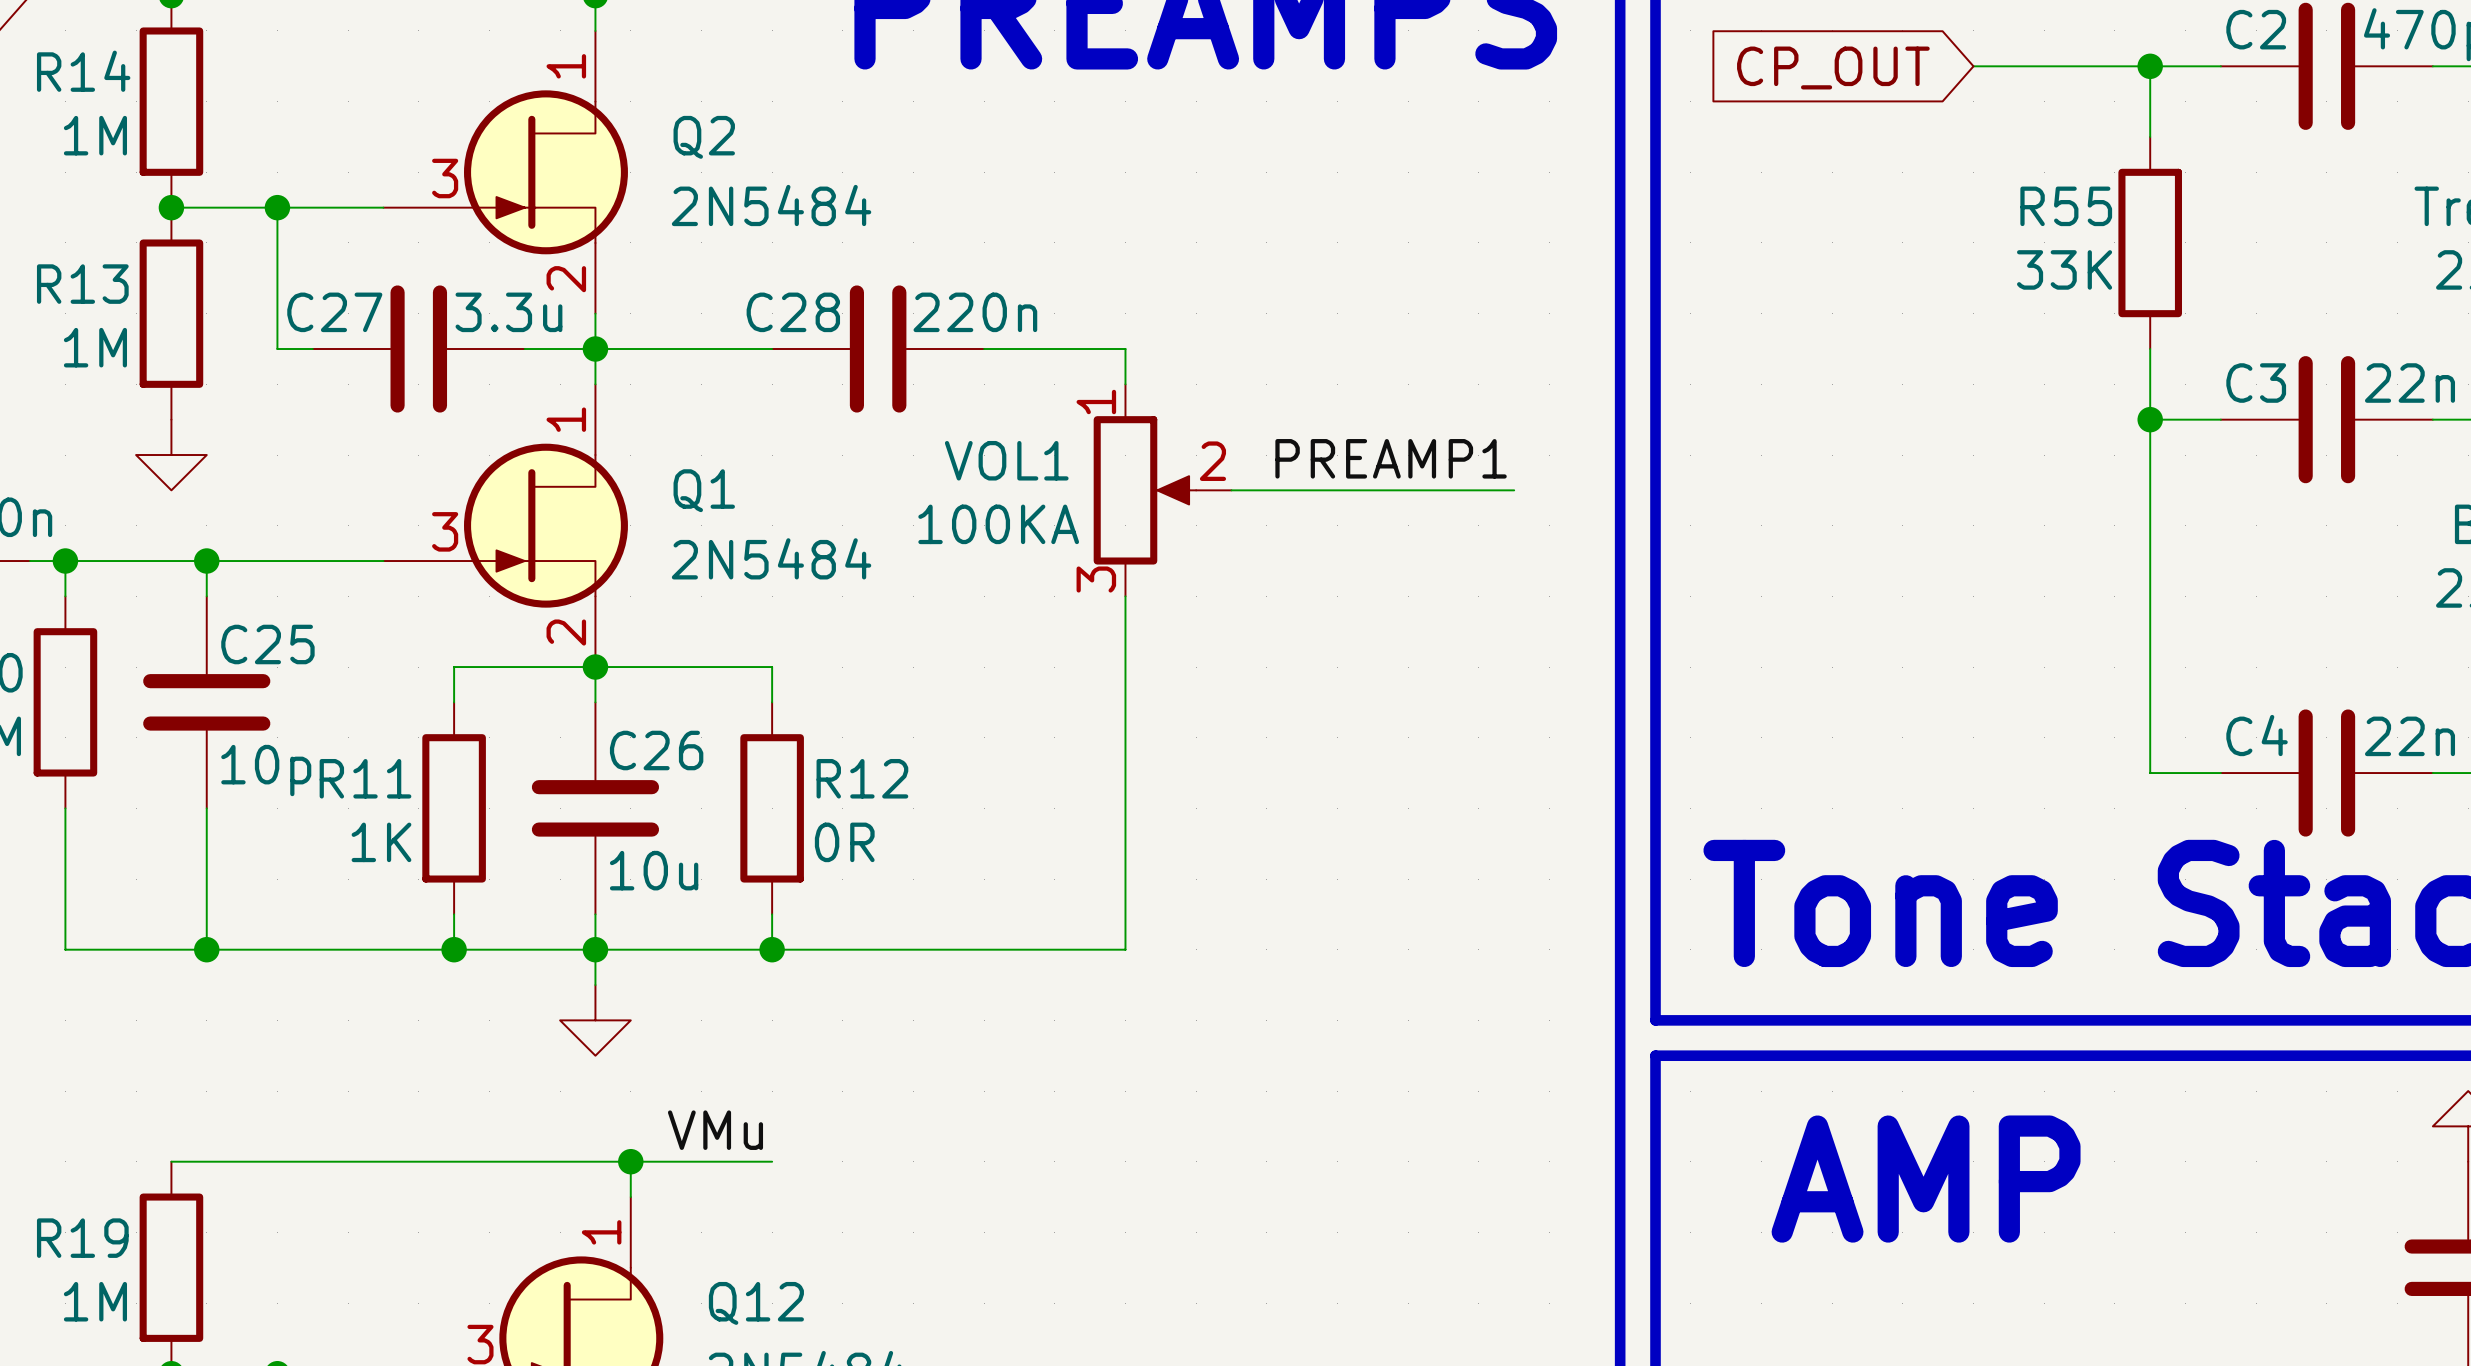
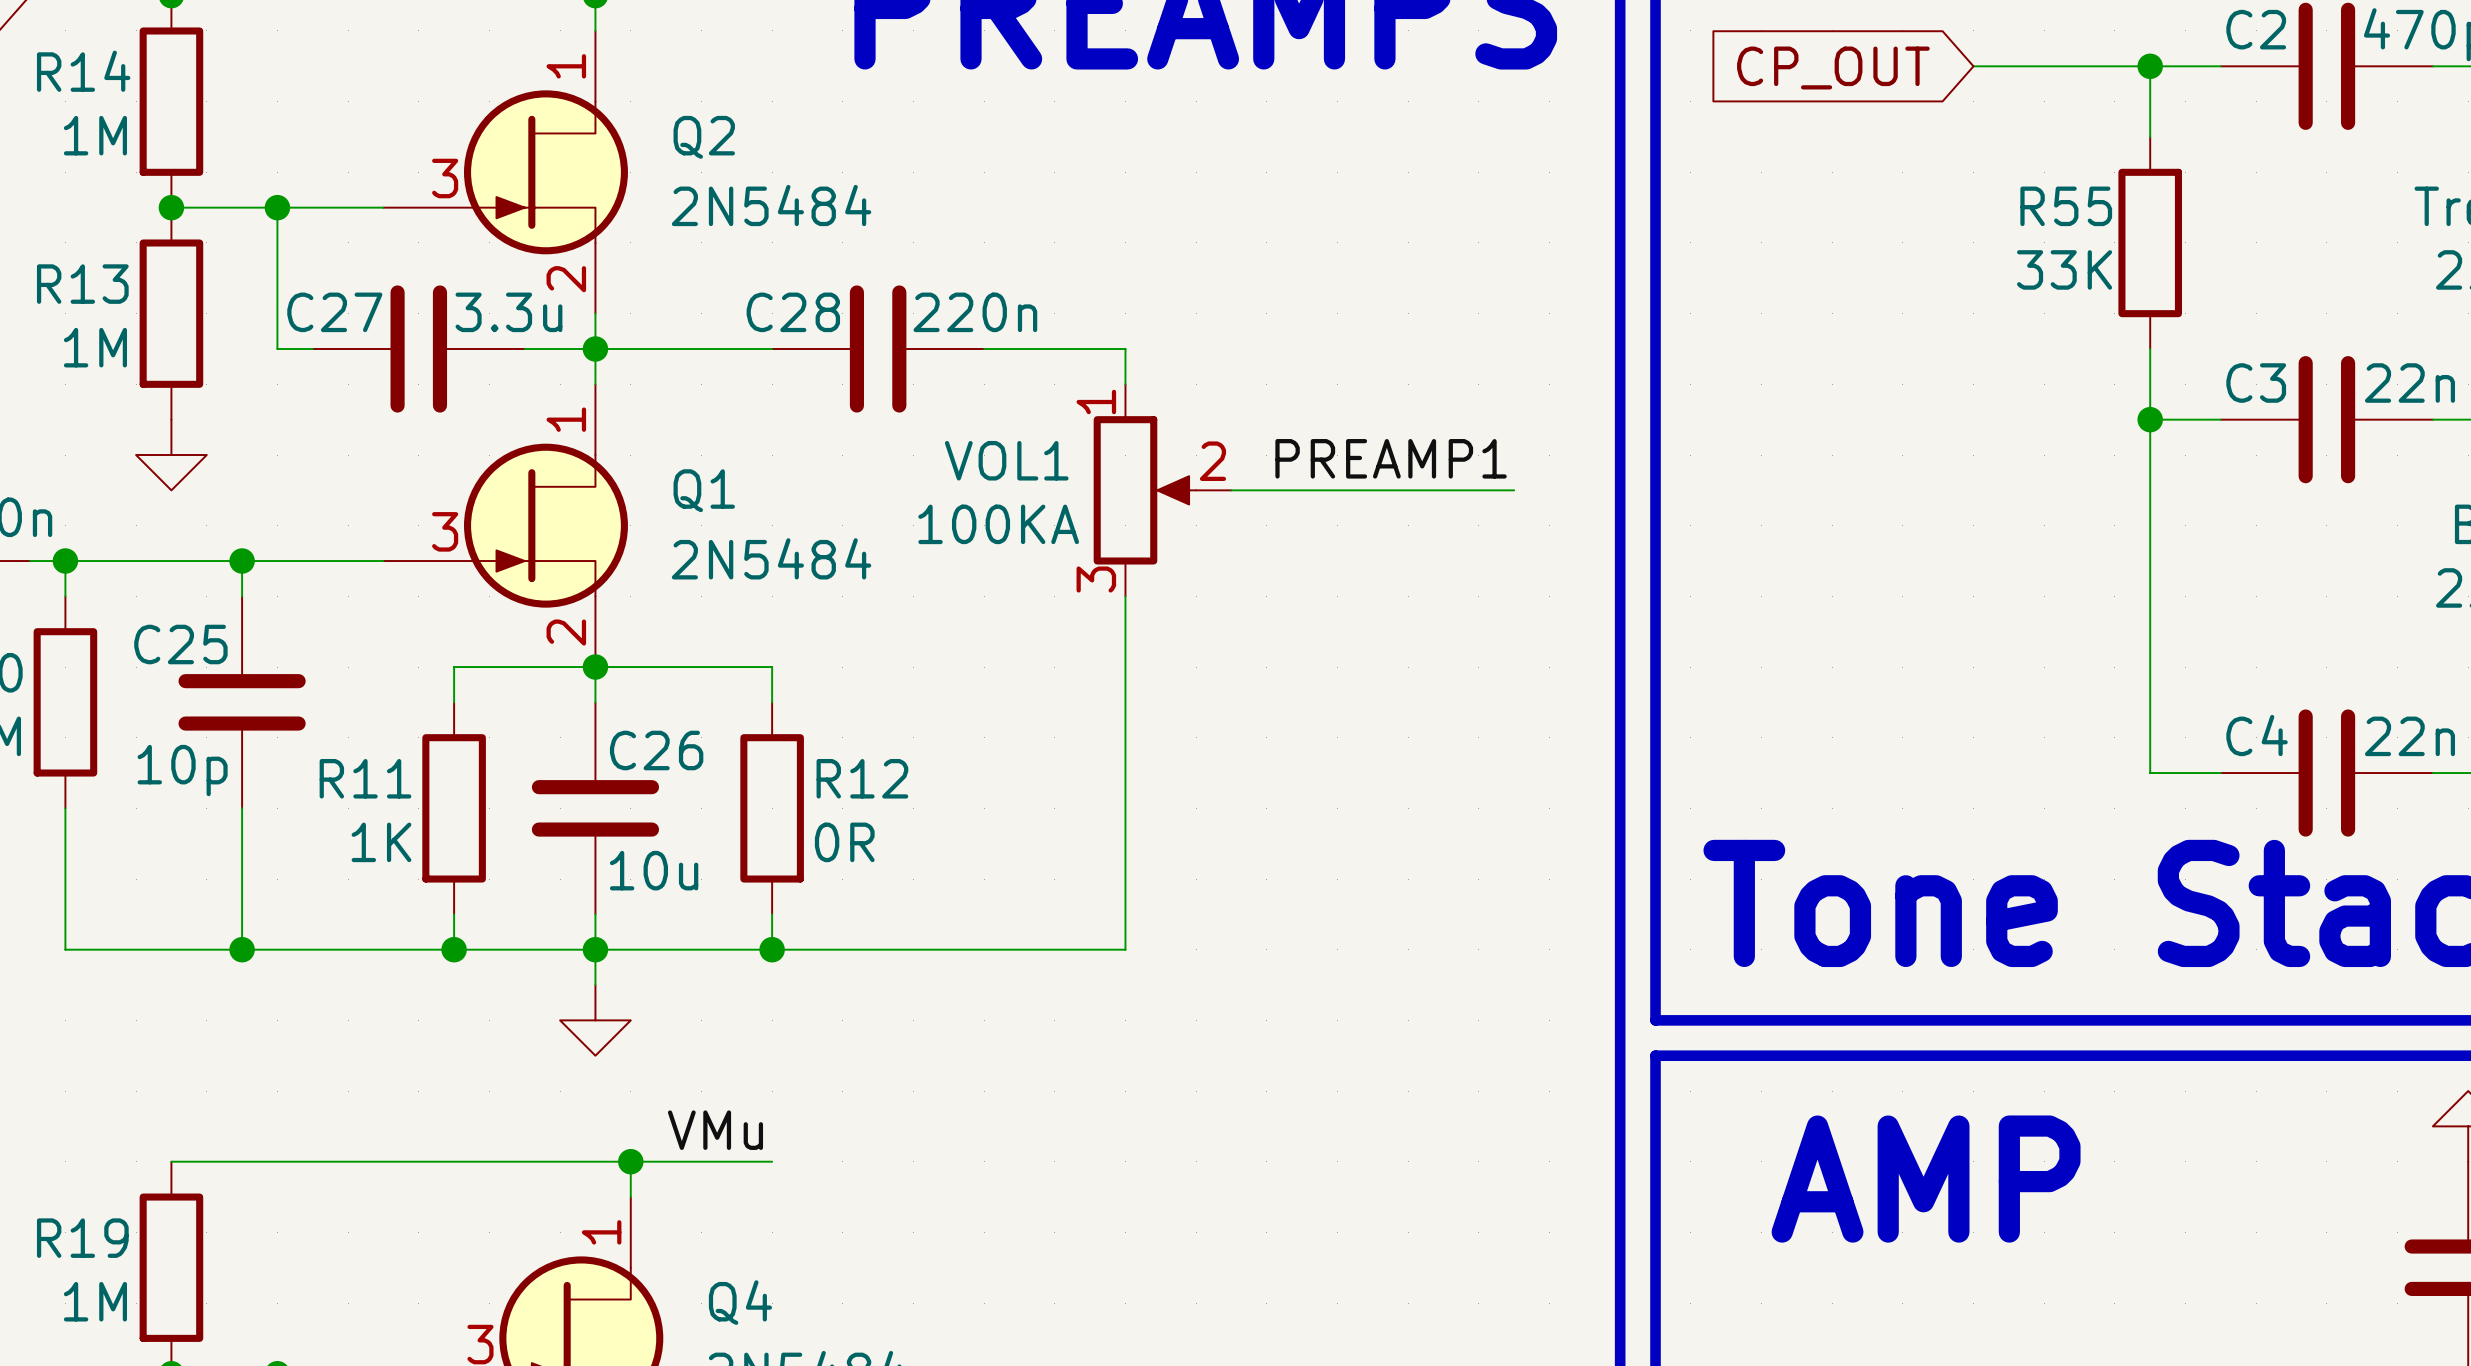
wire: (206, 561) (206, 596) -> (242, 561) (242, 596)
junction position: (206, 561) -> (242, 561)
C25 name position: C25 (267, 644) -> C25 (180, 644)
C25 position: (206, 702) -> (242, 702)
C25 value position: 10p (266, 770) -> 10p (182, 770)
wire: (206, 808) (206, 949) -> (242, 808) (242, 949)
junction position: (206, 949) -> (242, 949)
Q12 name: Q12 (756, 1303) -> Q4 (740, 1302)

